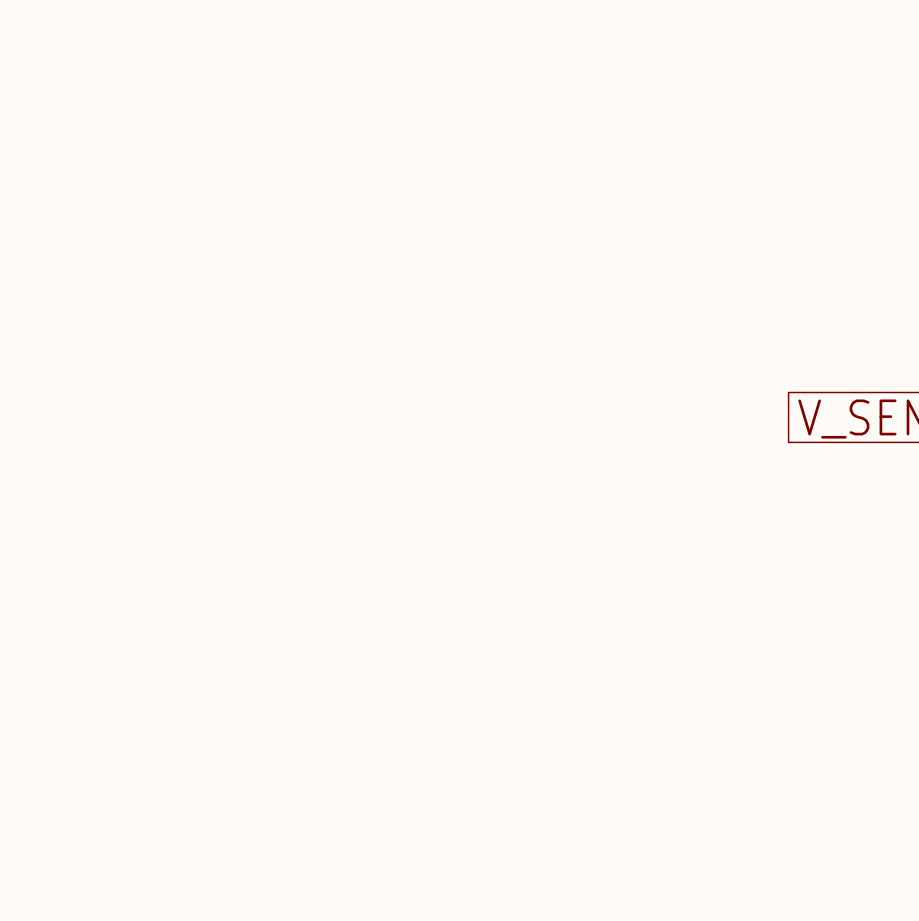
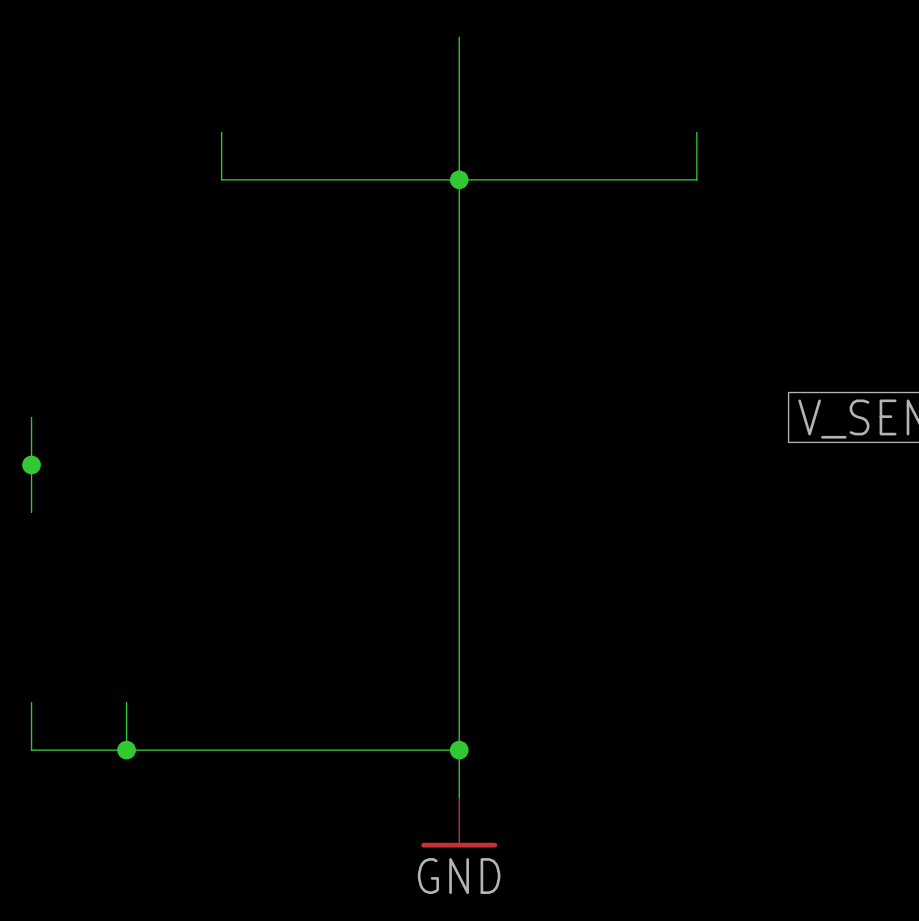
wire: none -> (459, 37) (459, 797)
wire: none -> (221, 132) (221, 179) (696, 179) (696, 132)
junction: none -> (459, 179)
wire: none -> (31, 417) (31, 512)
junction: none -> (31, 464)
wire: none -> (31, 702) (31, 750) (459, 750)
wire: none -> (126, 702) (126, 750)
junction: none -> (126, 750)
junction: none -> (459, 750)
power symbol: none -> GND (459, 822)

